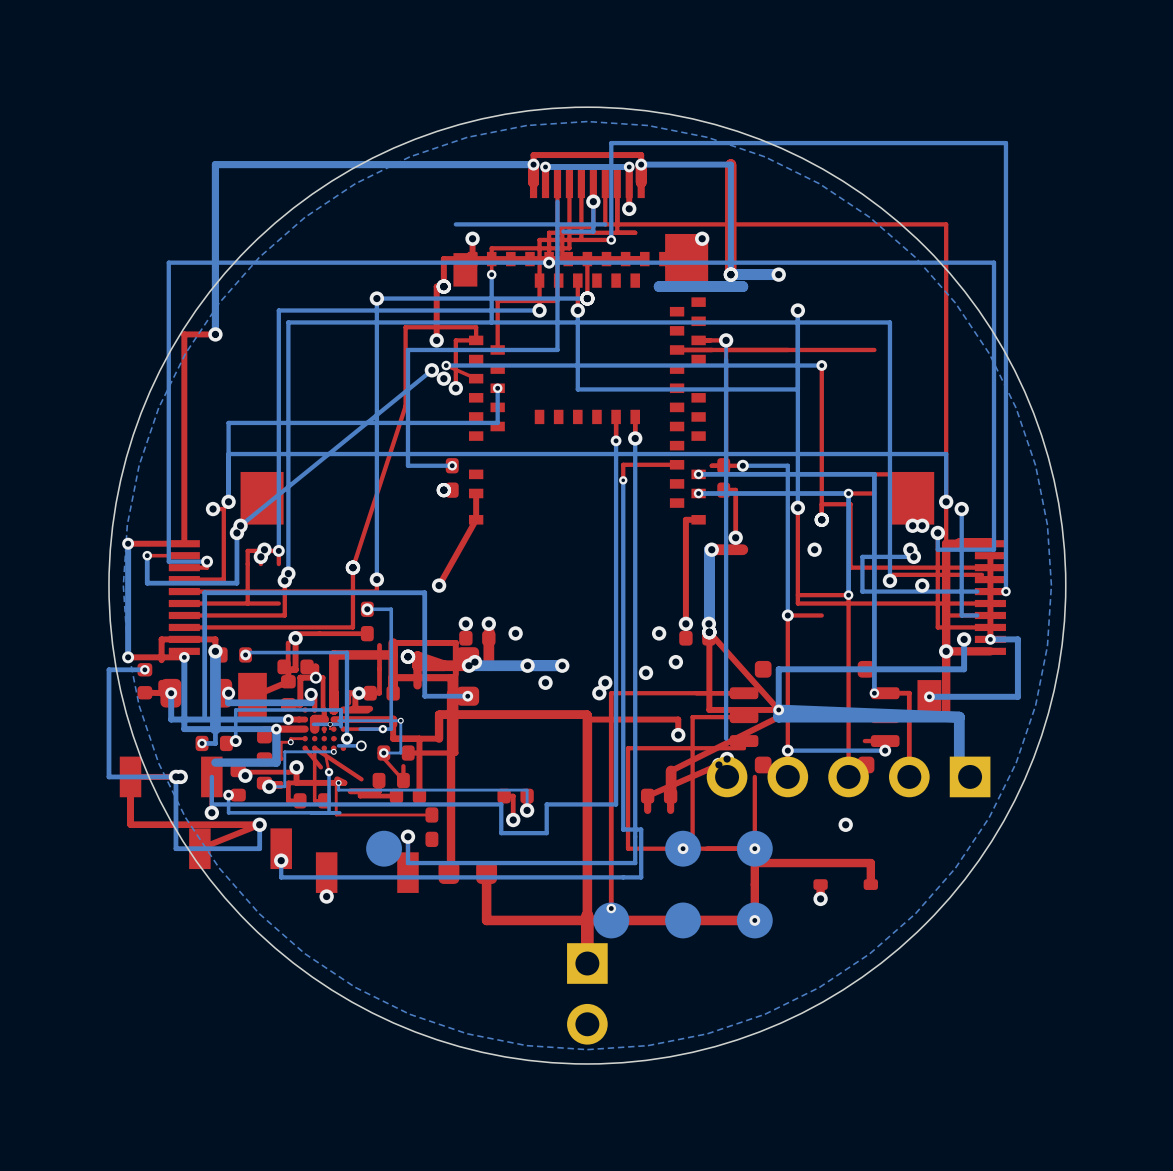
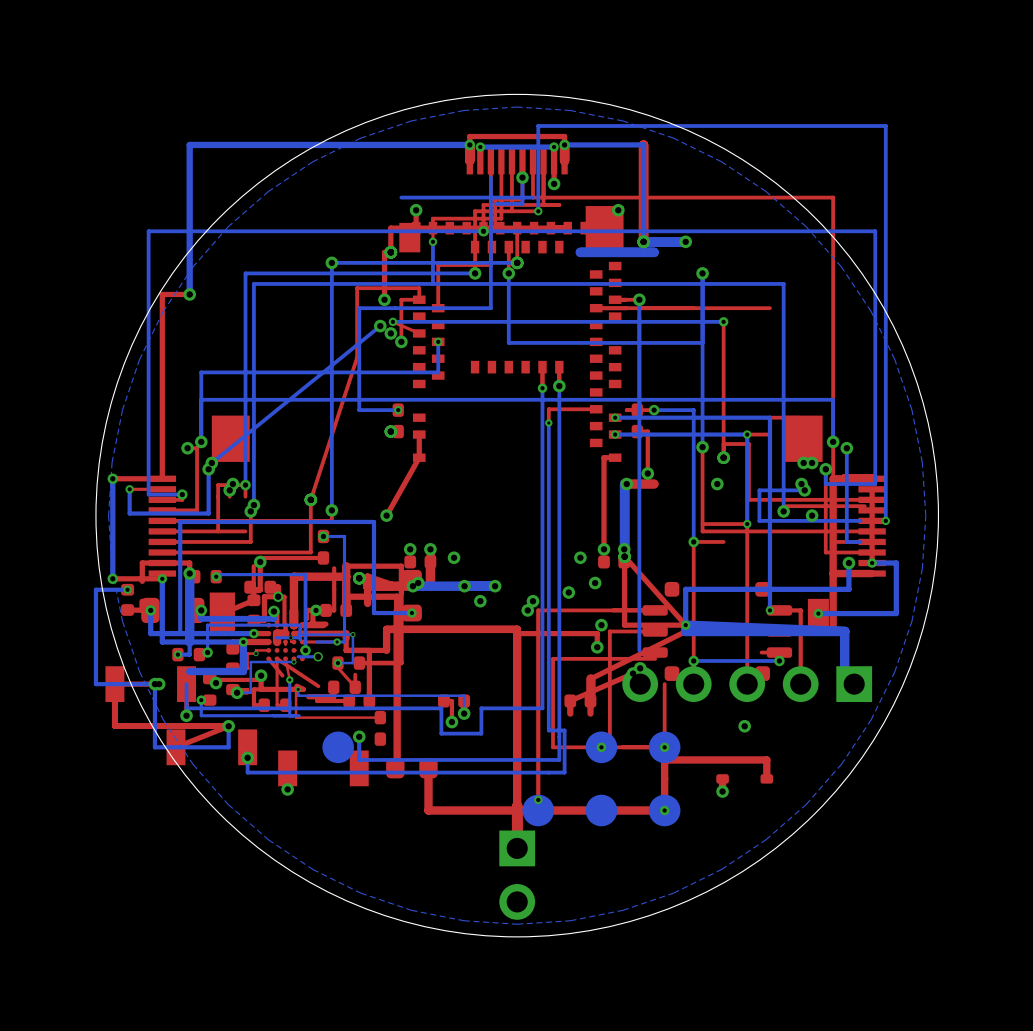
via: (946, 651) -> none
via: none -> (601, 625)

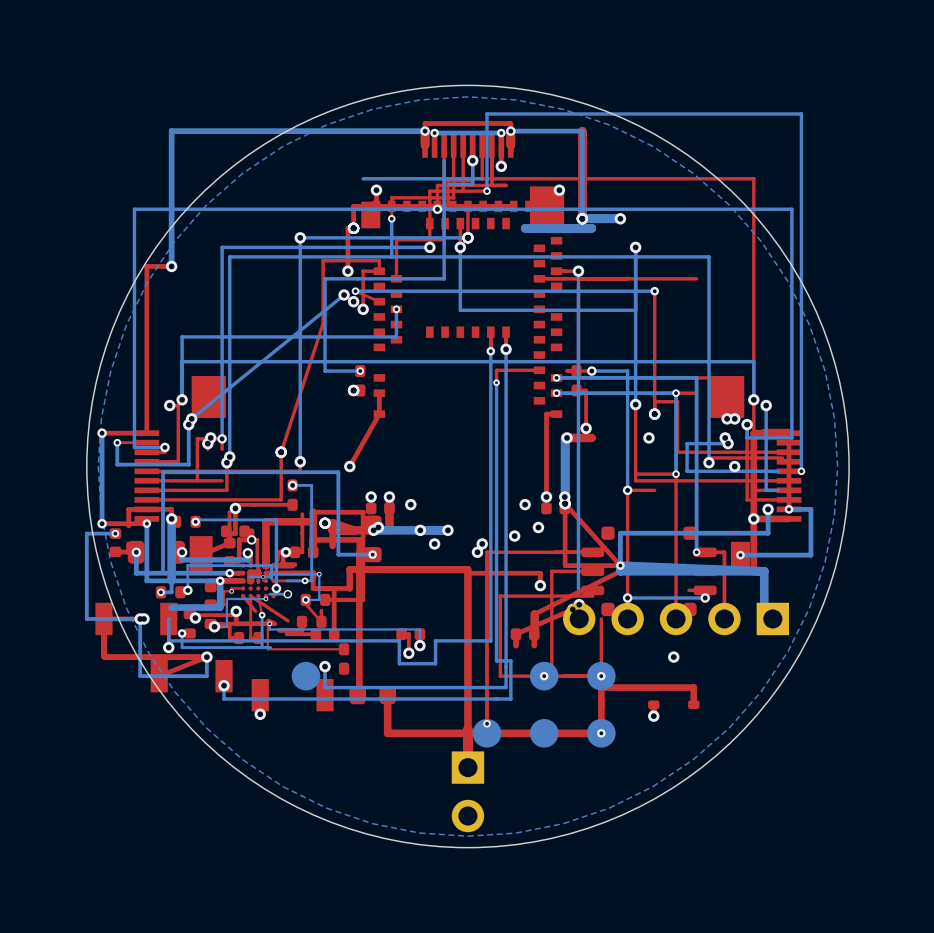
via: none -> (753, 518)
via: (601, 625) -> none

